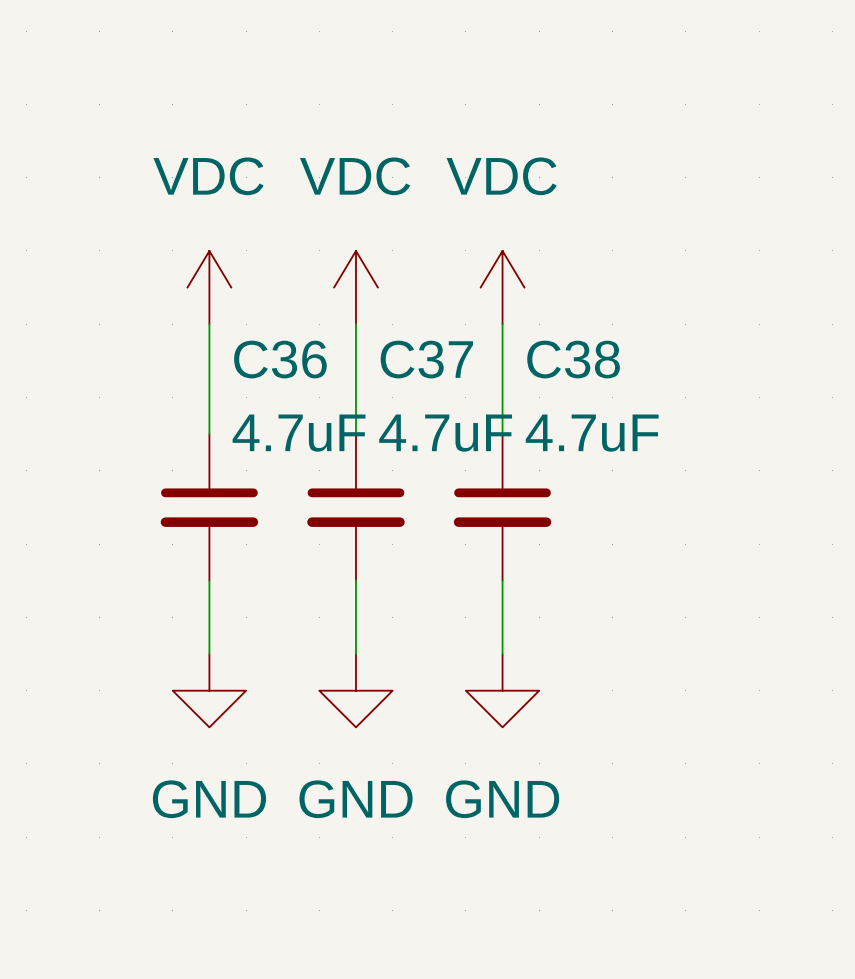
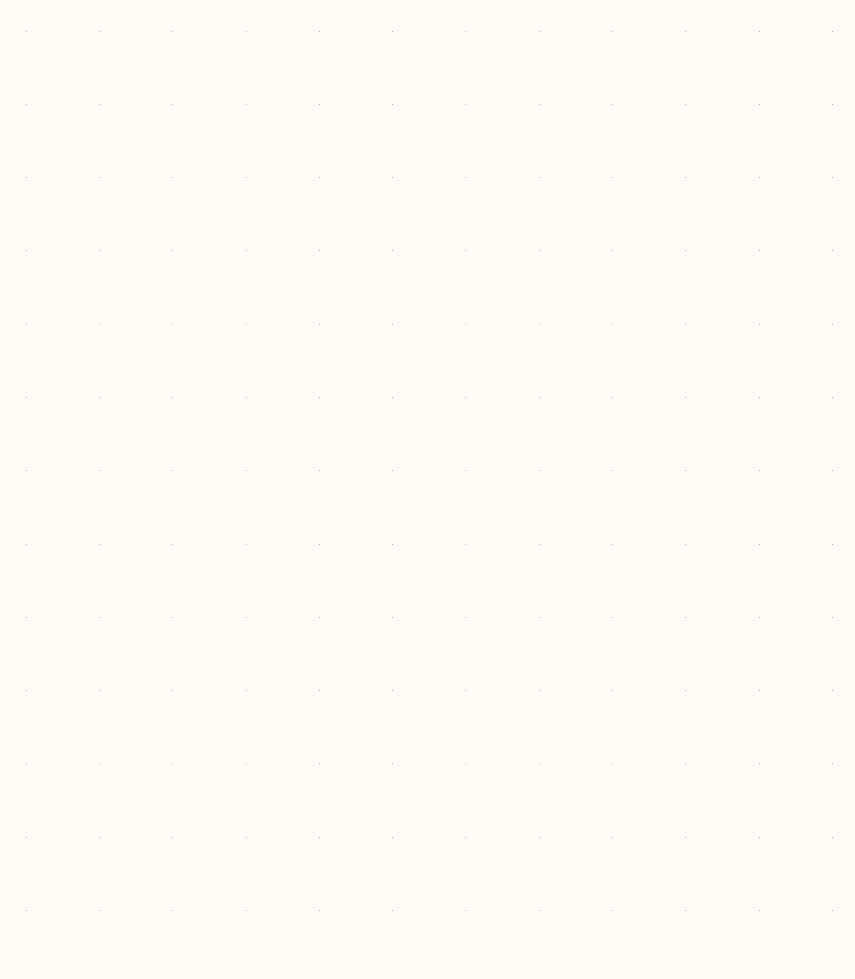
power symbol: VDC (209, 287) -> none
power symbol: VDC (355, 287) -> none
power symbol: VDC (502, 287) -> none
wire: (209, 324) (209, 434) -> none
wire: (355, 324) (355, 434) -> none
wire: (502, 324) (502, 434) -> none
C36: 4.7uF (209, 507) -> none
C37: 4.7uF (355, 507) -> none
C38: 4.7uF (502, 507) -> none
wire: (209, 580) (209, 654) -> none
wire: (355, 580) (355, 654) -> none
wire: (502, 580) (502, 654) -> none
power symbol: GND (209, 690) -> none
power symbol: GND (355, 690) -> none
power symbol: GND (502, 690) -> none

